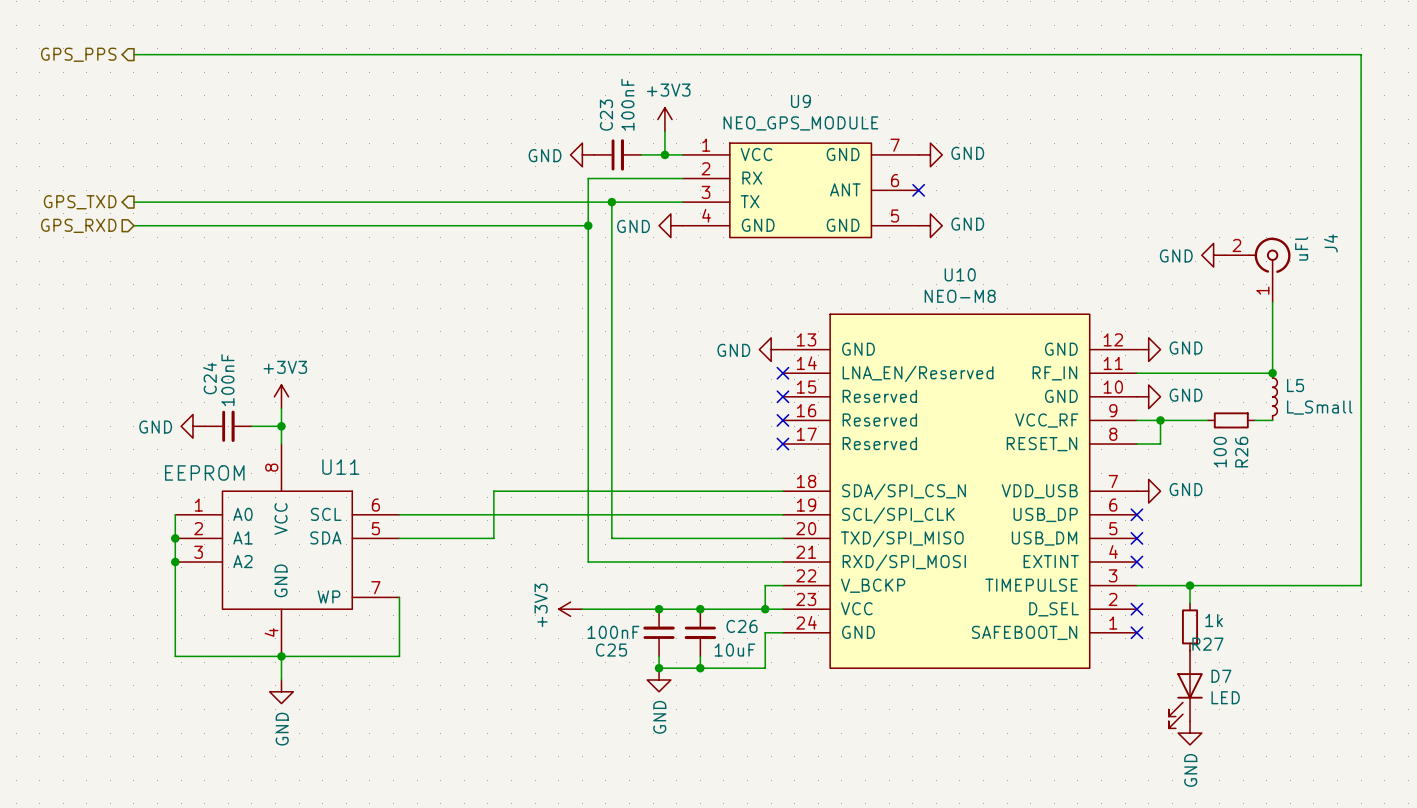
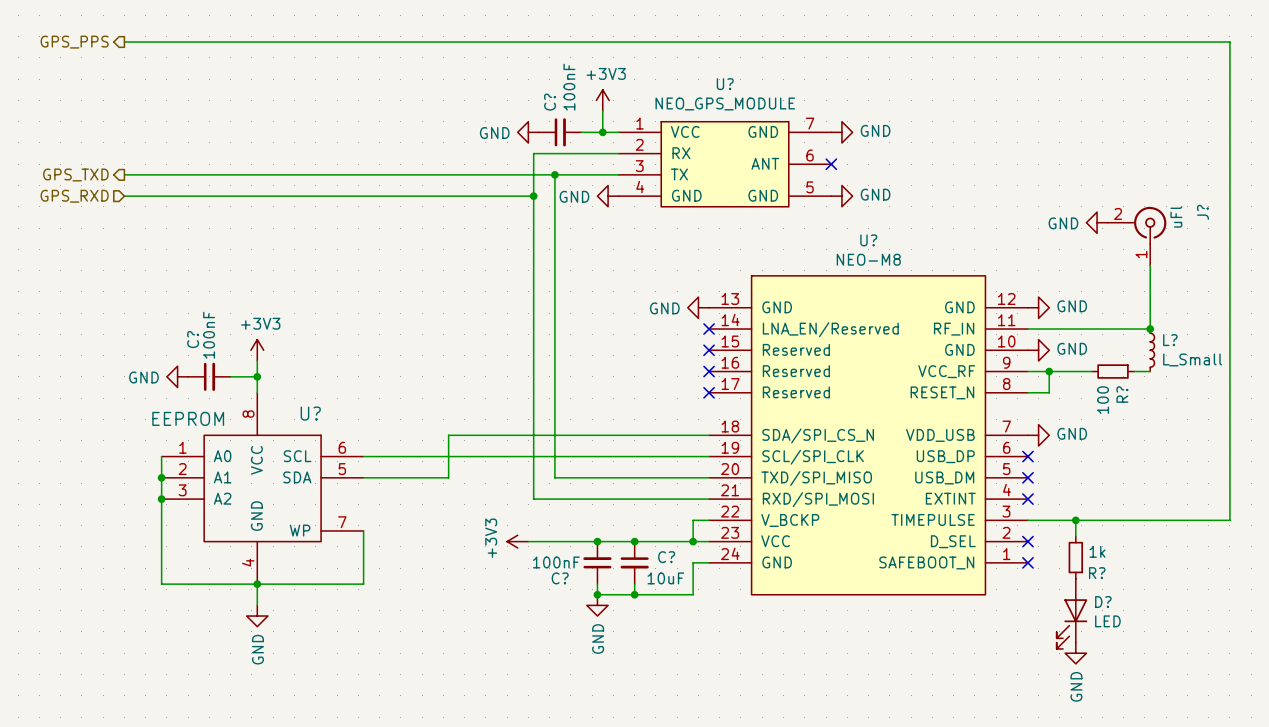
U9 name: U9 (800, 101) -> U? (725, 84)
C23 name: C23 (606, 115) -> C? (550, 102)
J4 name: J4 (1330, 243) -> J? (1202, 212)
U10 name: U10 (960, 274) -> U? (868, 240)
C24 name: C24 (209, 378) -> C? (193, 339)
L5 name: L5 (1295, 385) -> L? (1170, 340)
R26 name: R26 (1241, 452) -> R? (1122, 394)
U11 name: U11 (340, 467) -> U? (310, 413)
C26 name: C26 (742, 626) -> C? (666, 557)
R27 name: R27 (1207, 644) -> R? (1097, 573)
C25 name: C25 (611, 650) -> C? (560, 578)
D7 name: D7 (1221, 676) -> D? (1103, 602)

